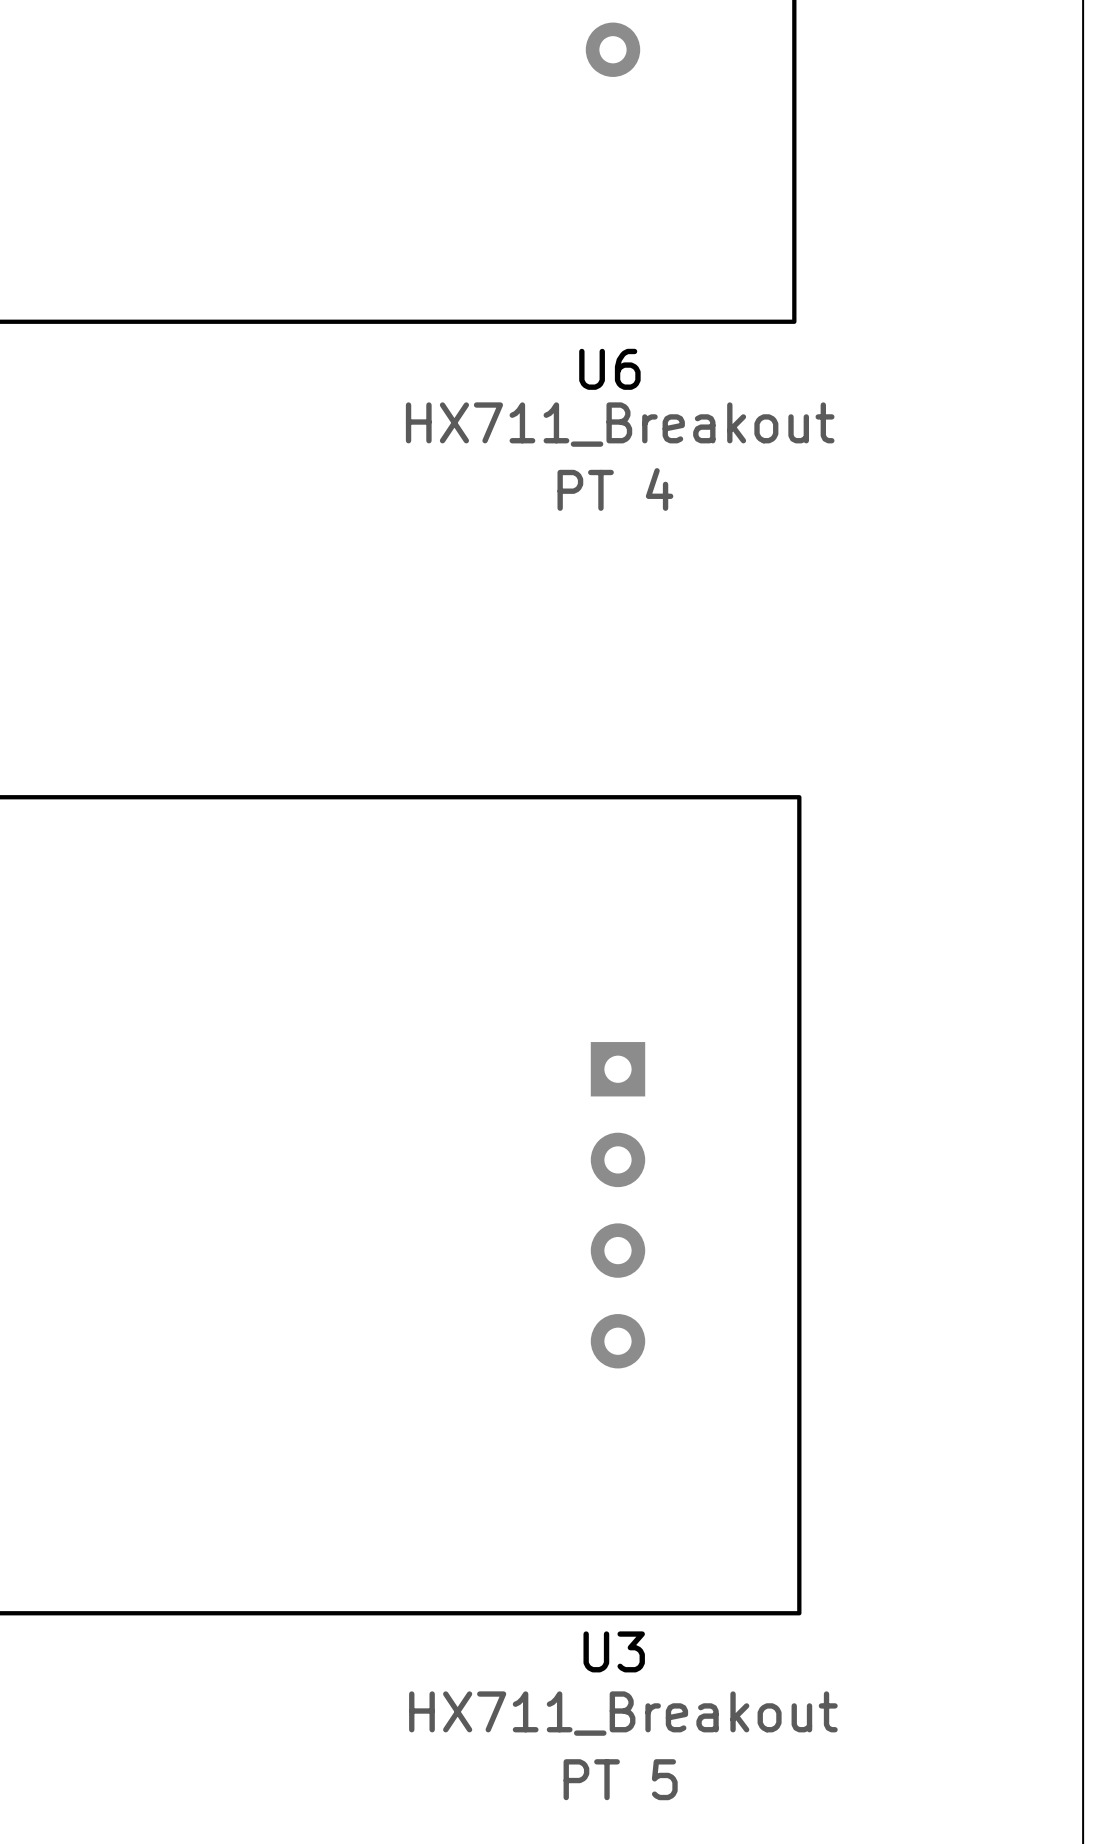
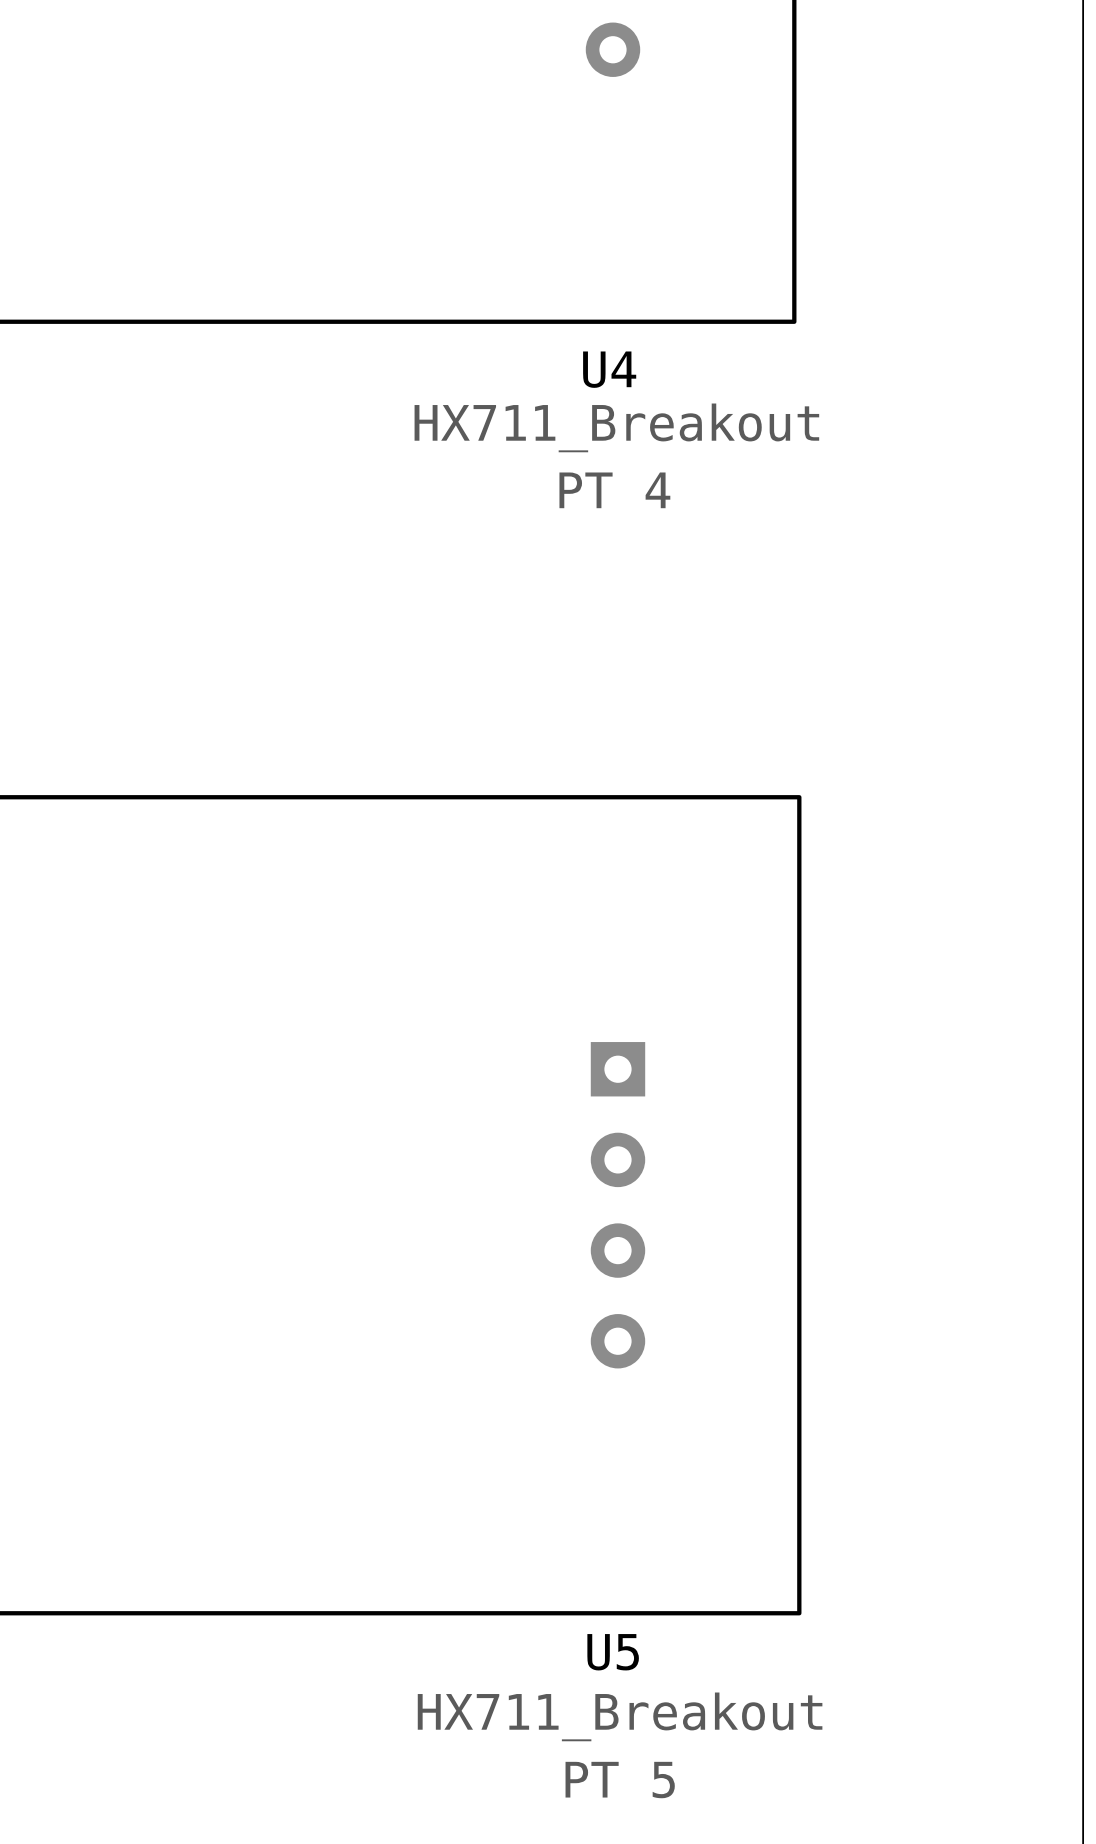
U6 name: U6 (609, 369) -> U4 (609, 369)
U3 name: U3 (614, 1651) -> U5 (613, 1652)

